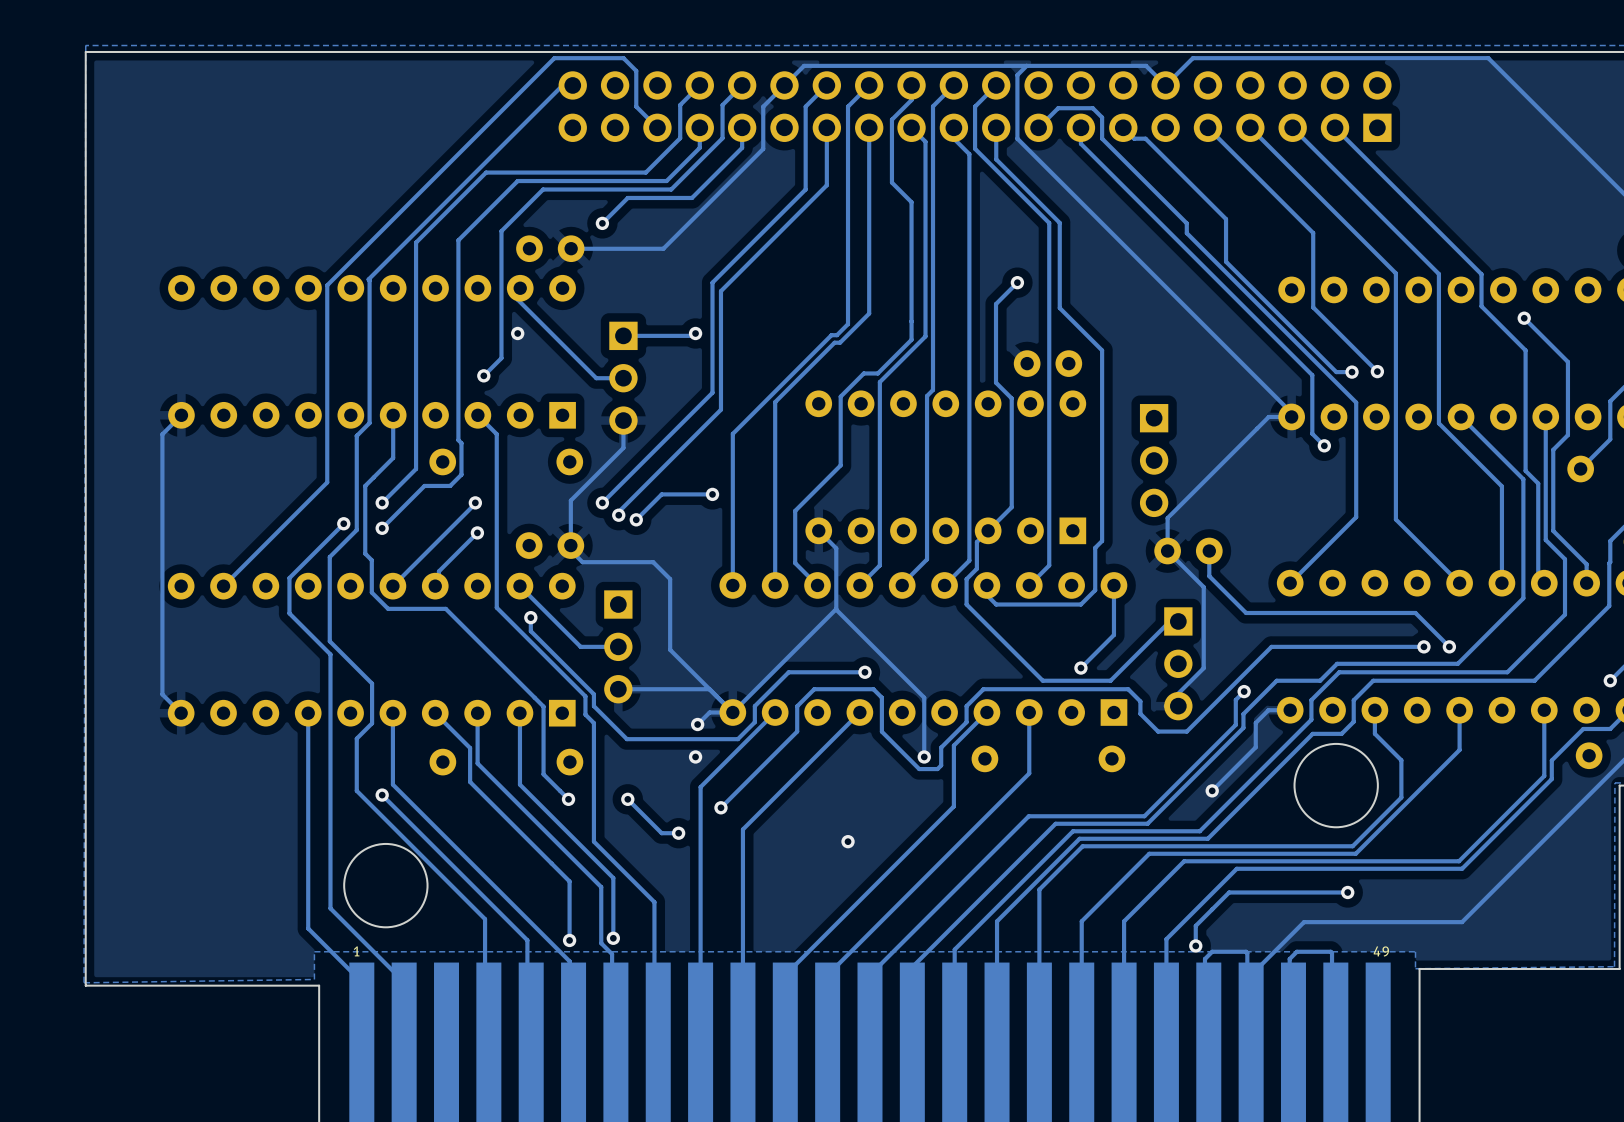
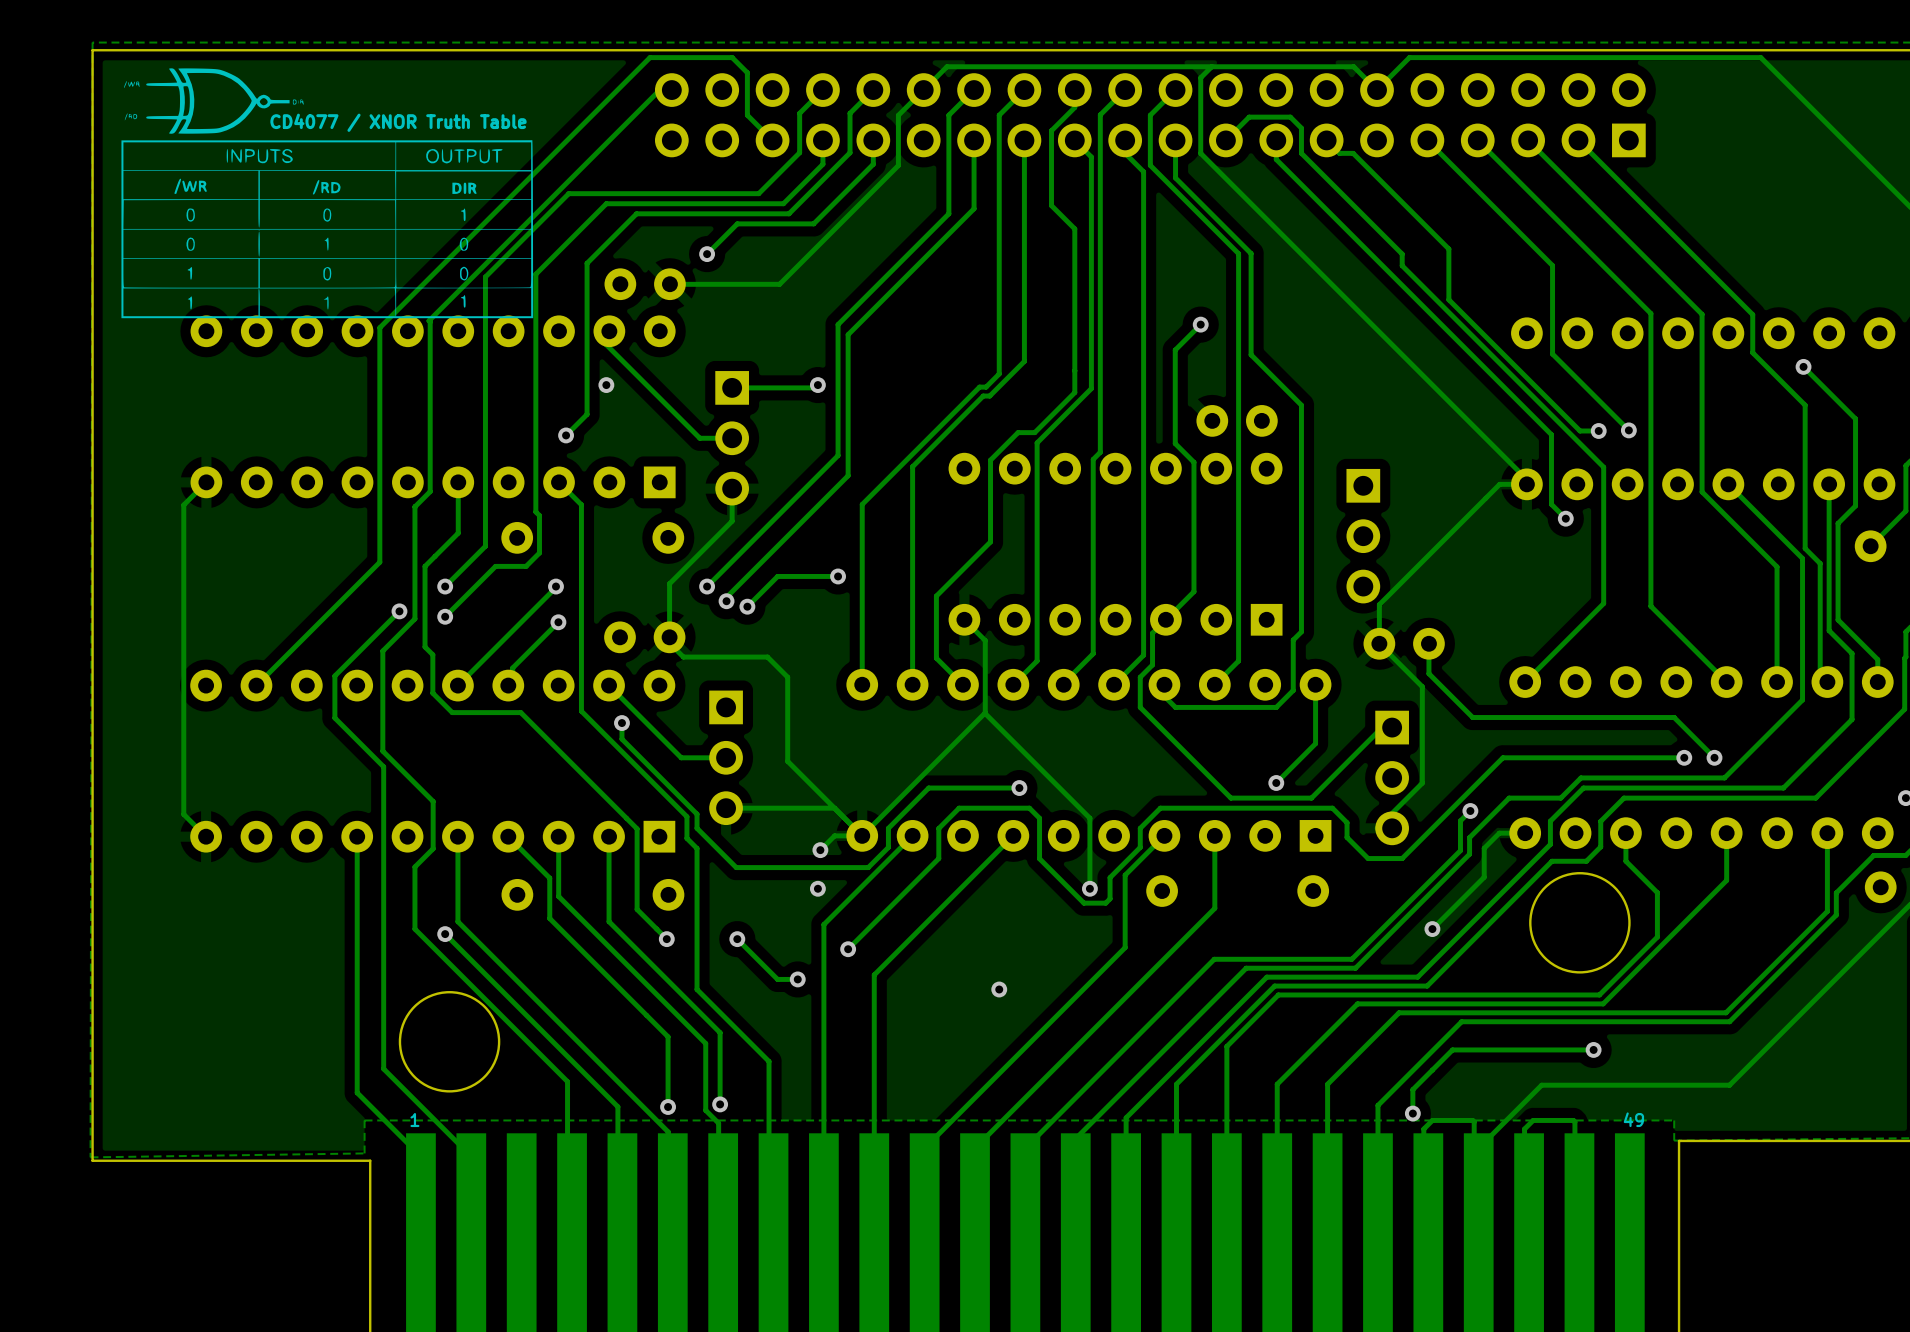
CD4077 / XNOR Truth Table: none -> (327, 193)

